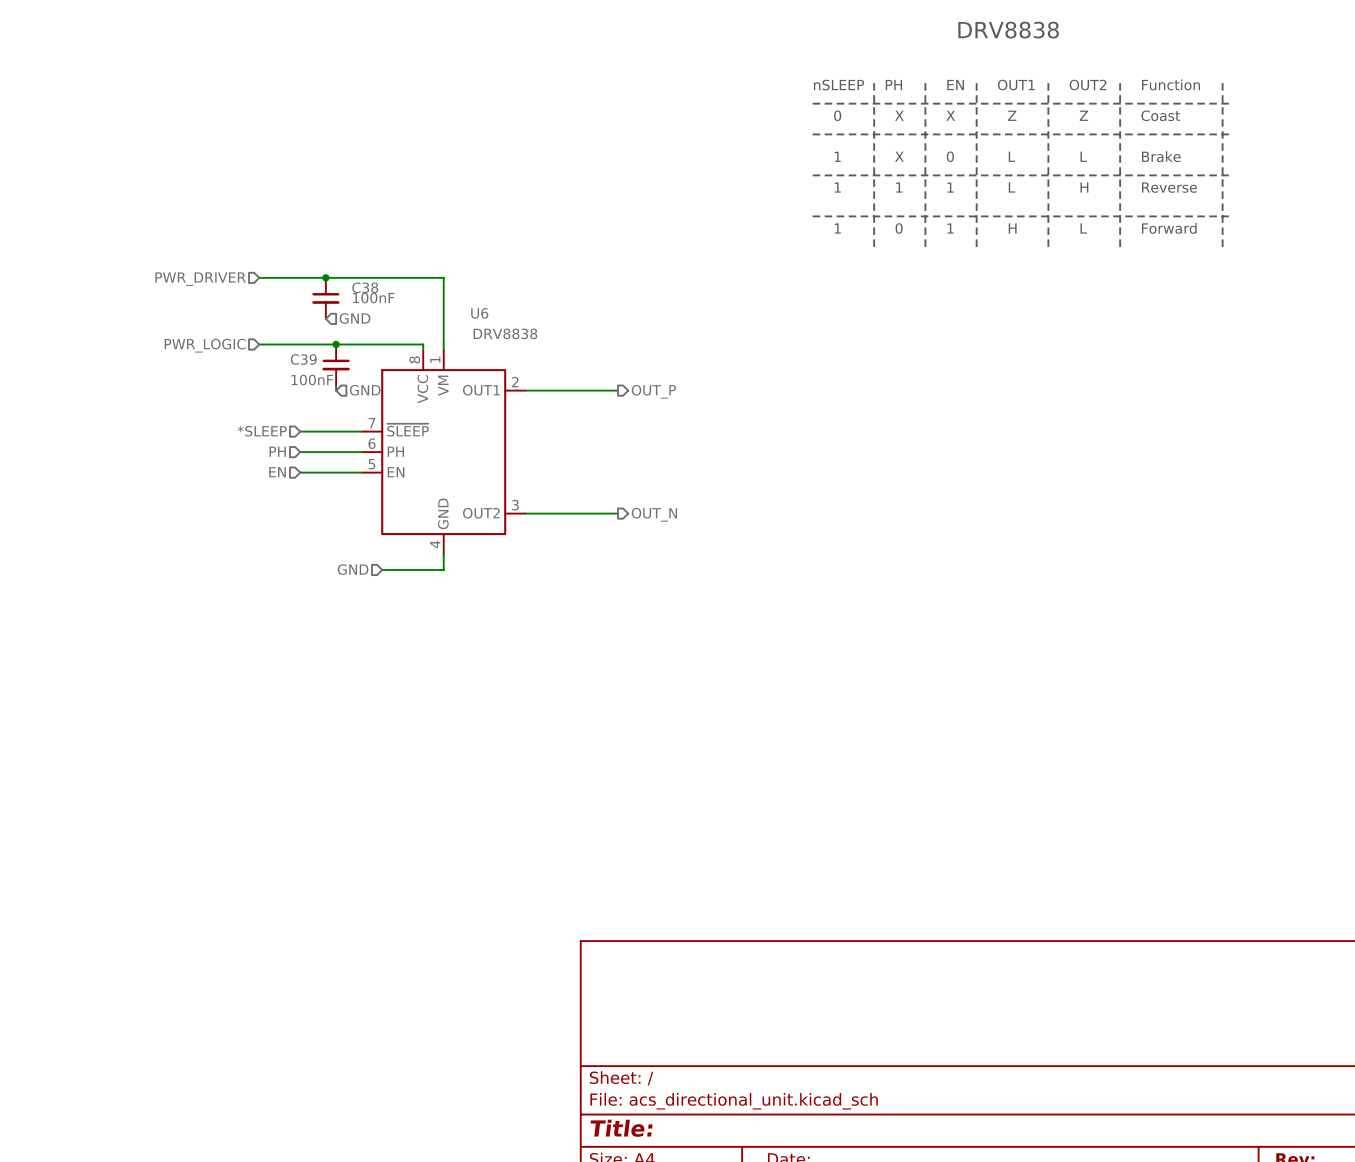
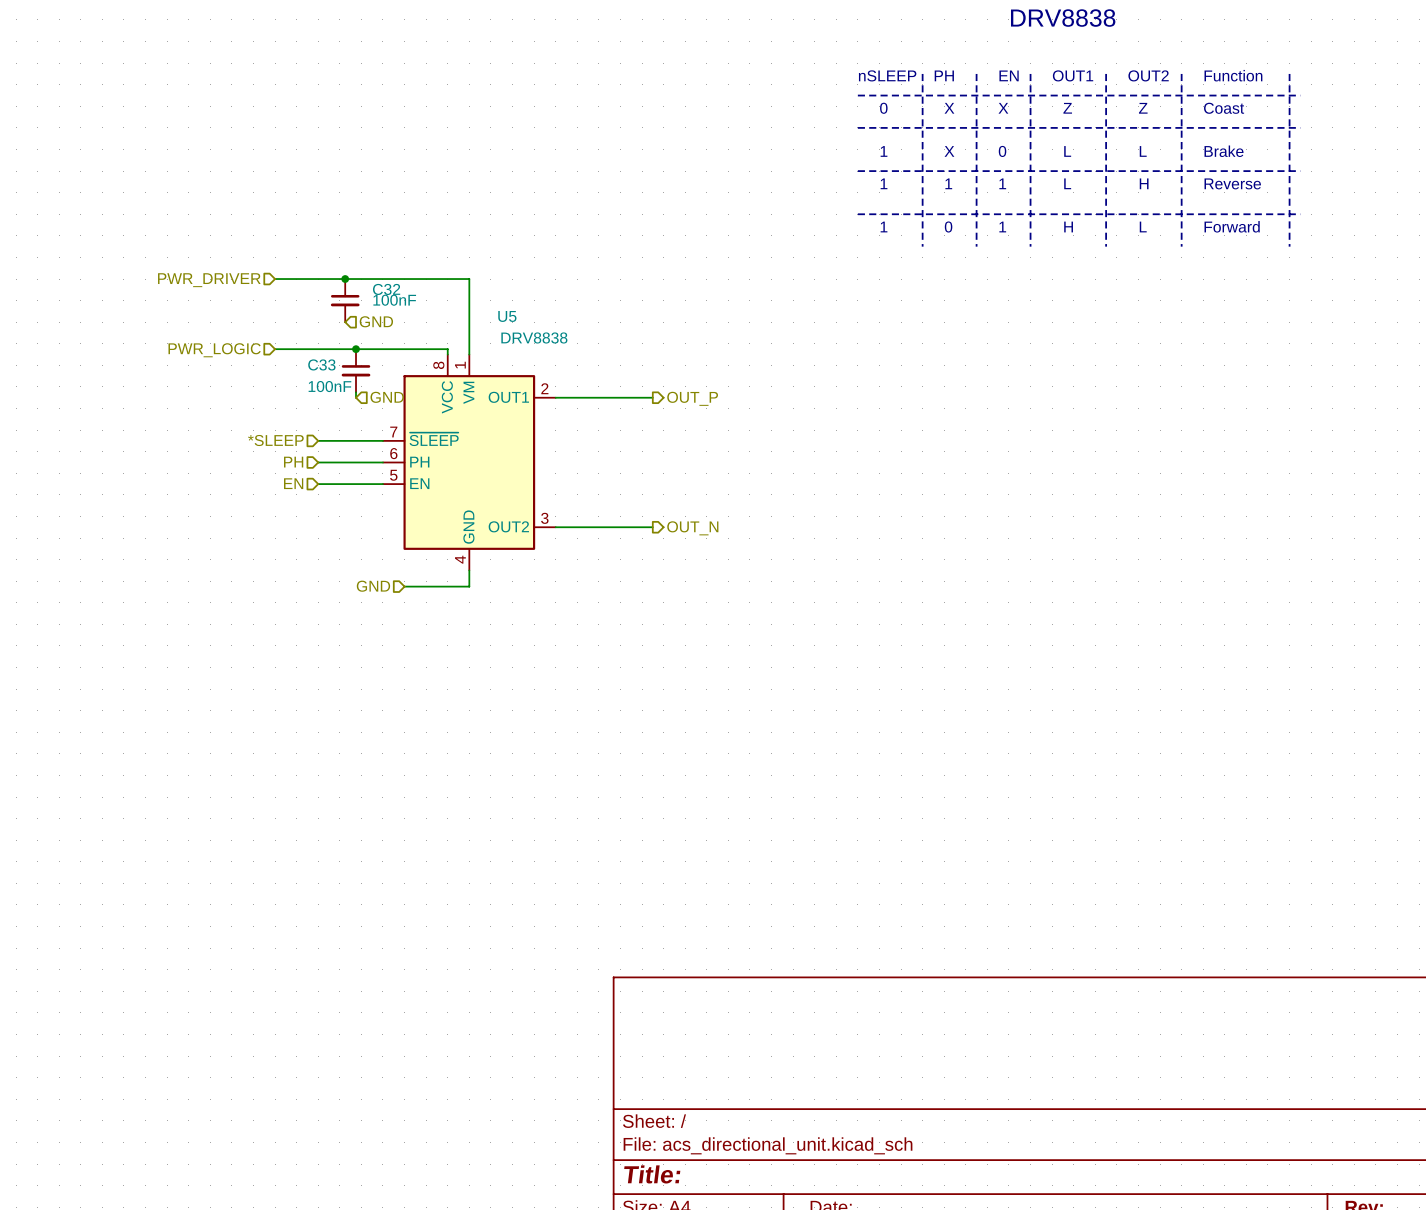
C38 name: C38 (365, 287) -> C32 (386, 289)
U6 name: U6 (479, 313) -> U5 (507, 316)
C39 name: C39 (303, 359) -> C33 (321, 364)

